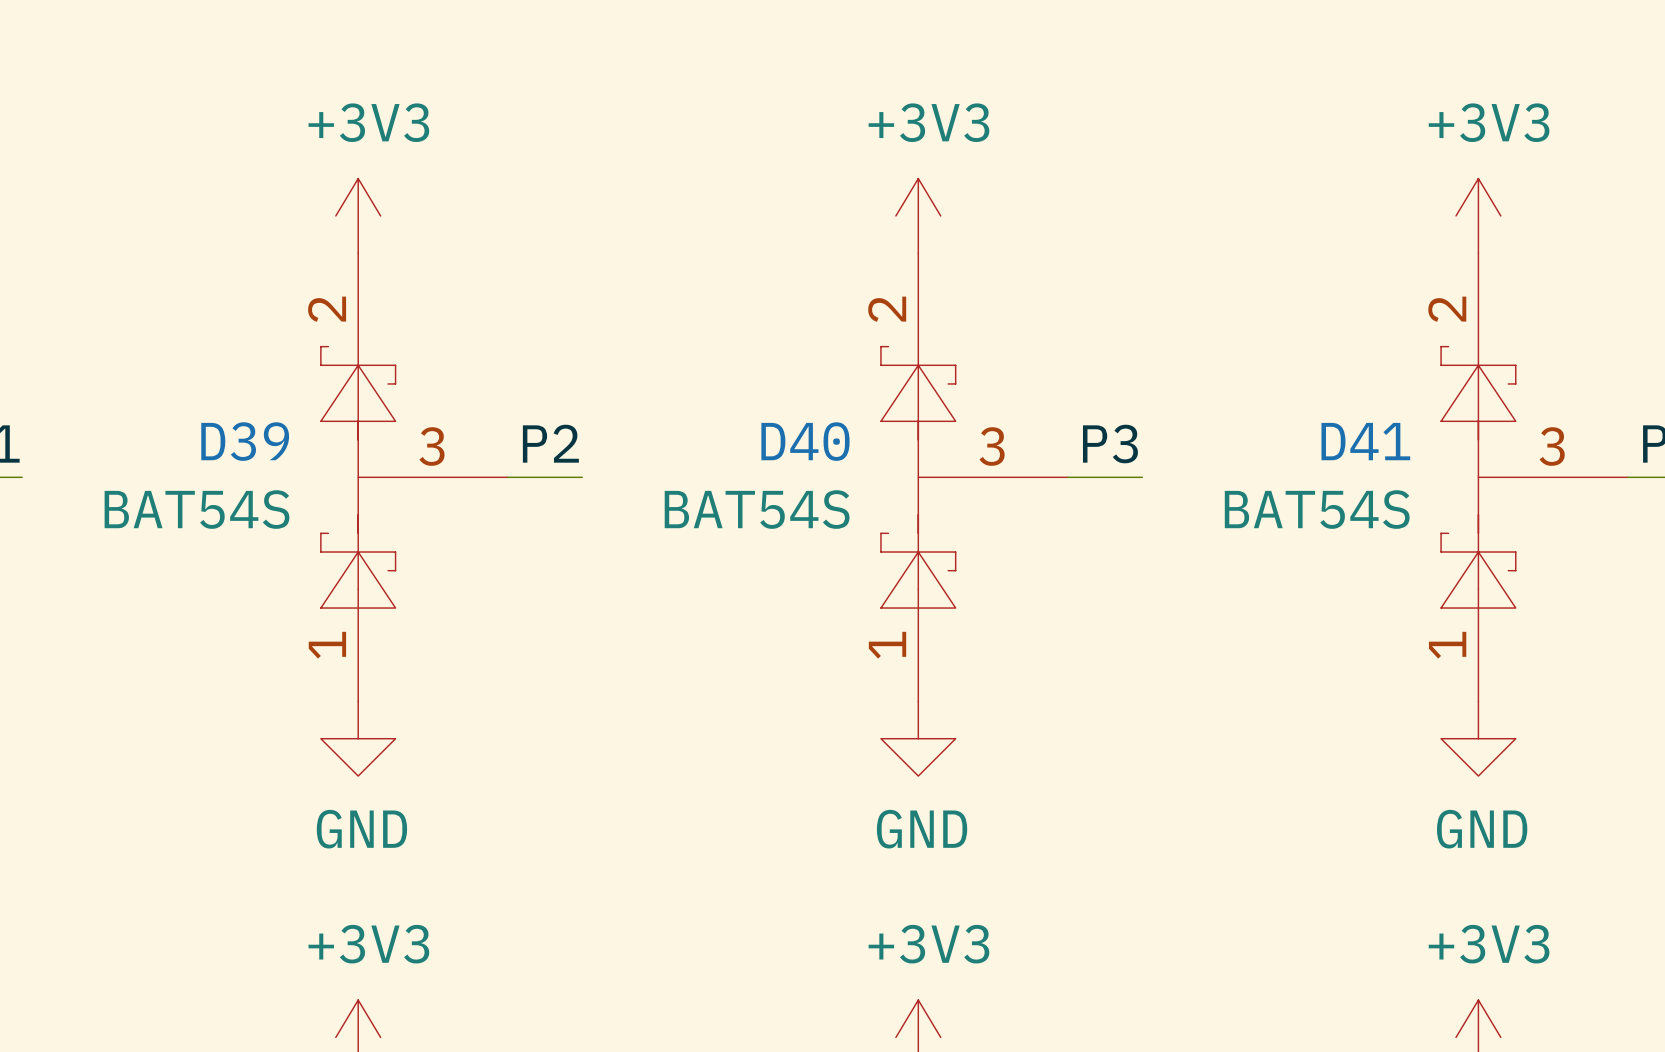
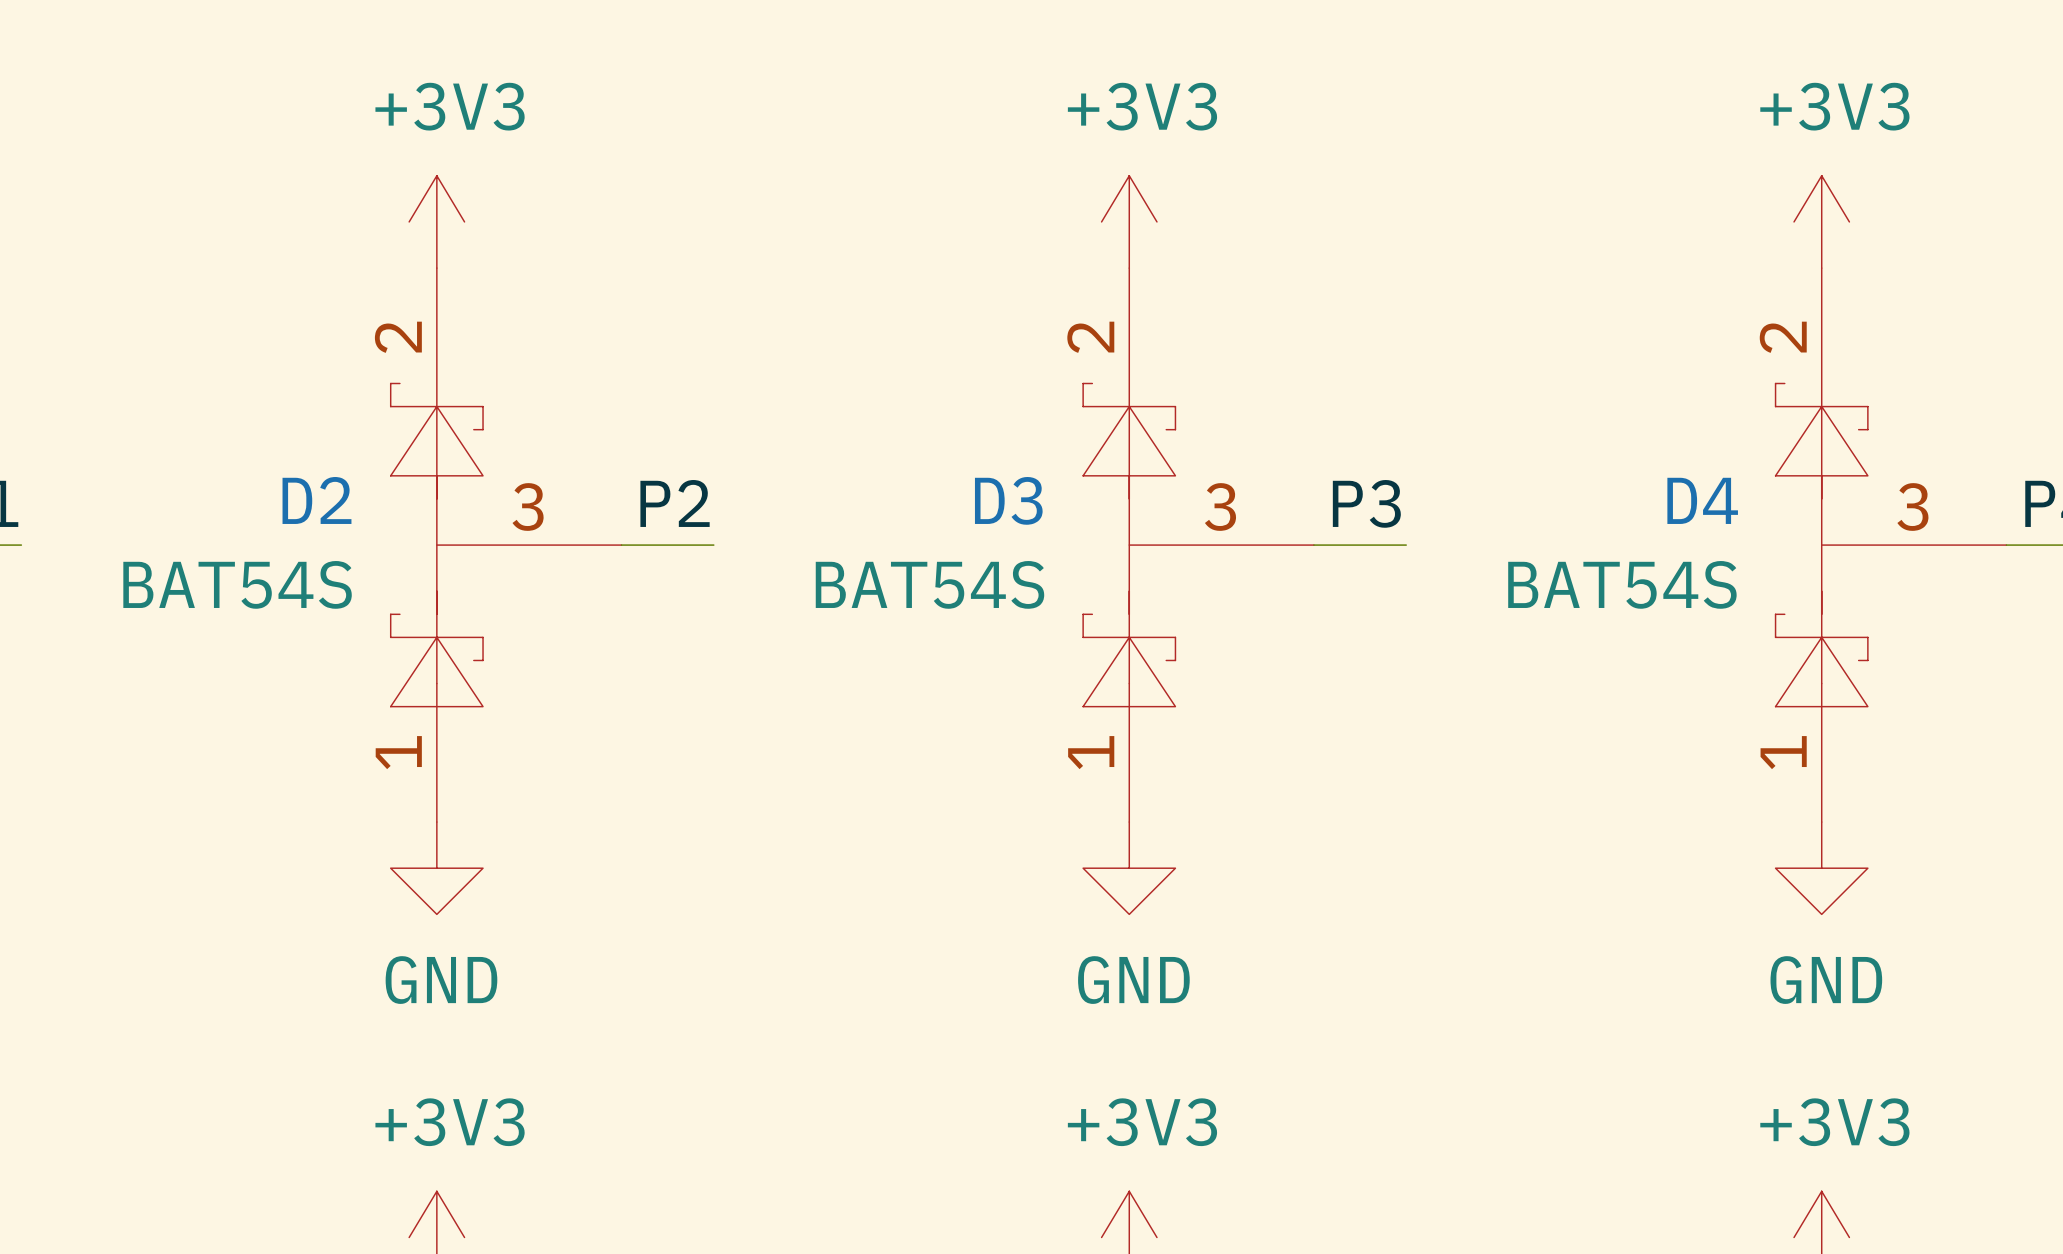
D39 name: D39 (245, 441) -> D2 (316, 500)
D40 name: D40 (805, 441) -> D3 (1008, 500)
D41 name: D41 (1365, 441) -> D4 (1702, 500)

